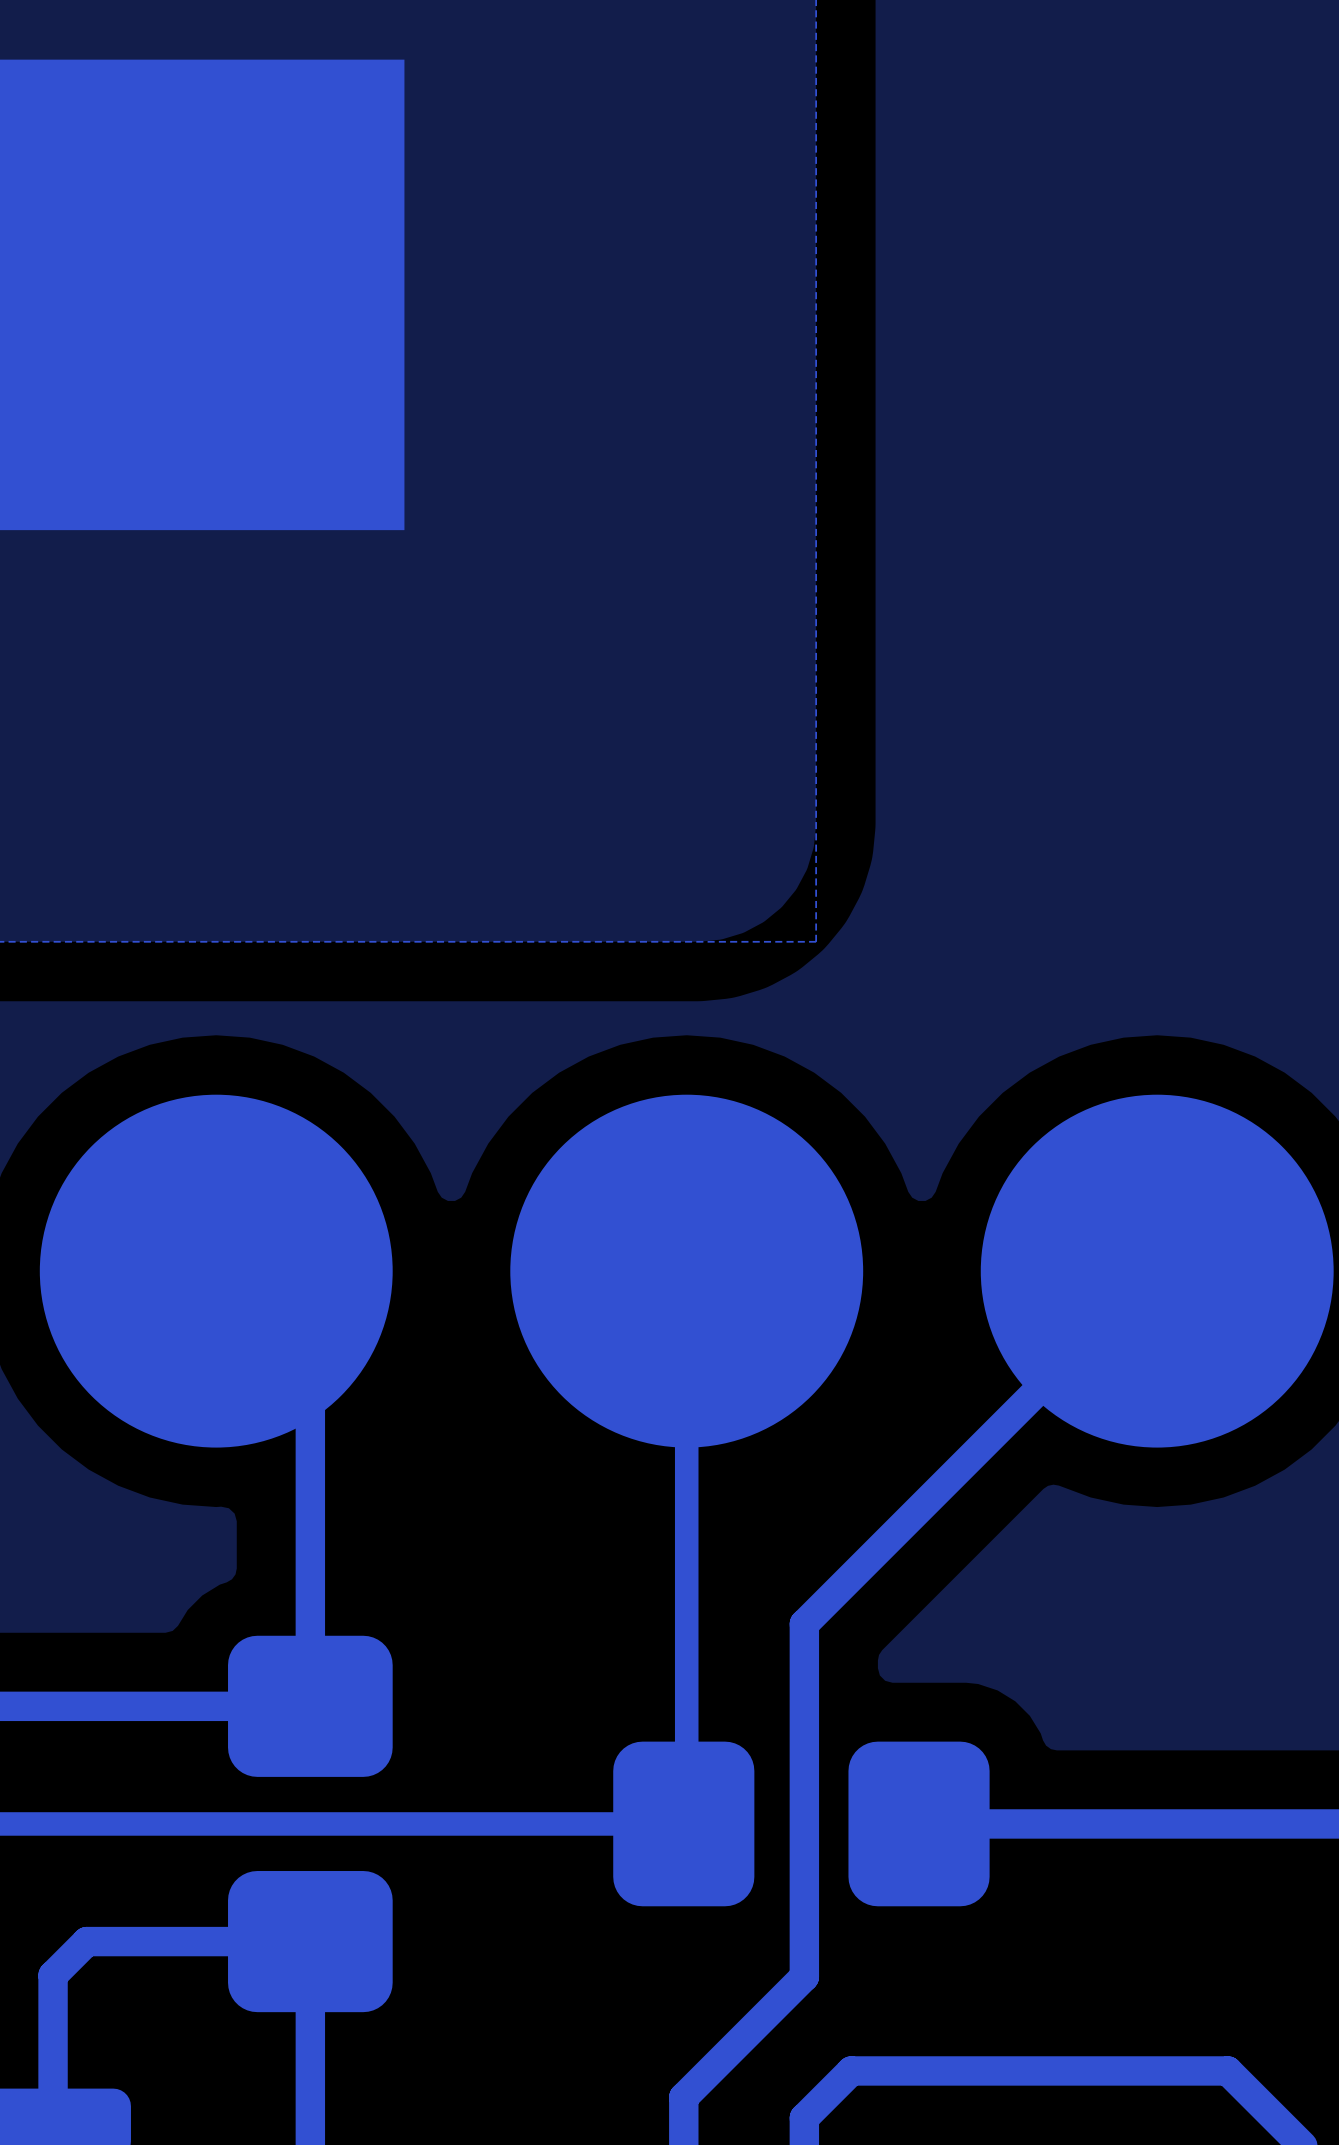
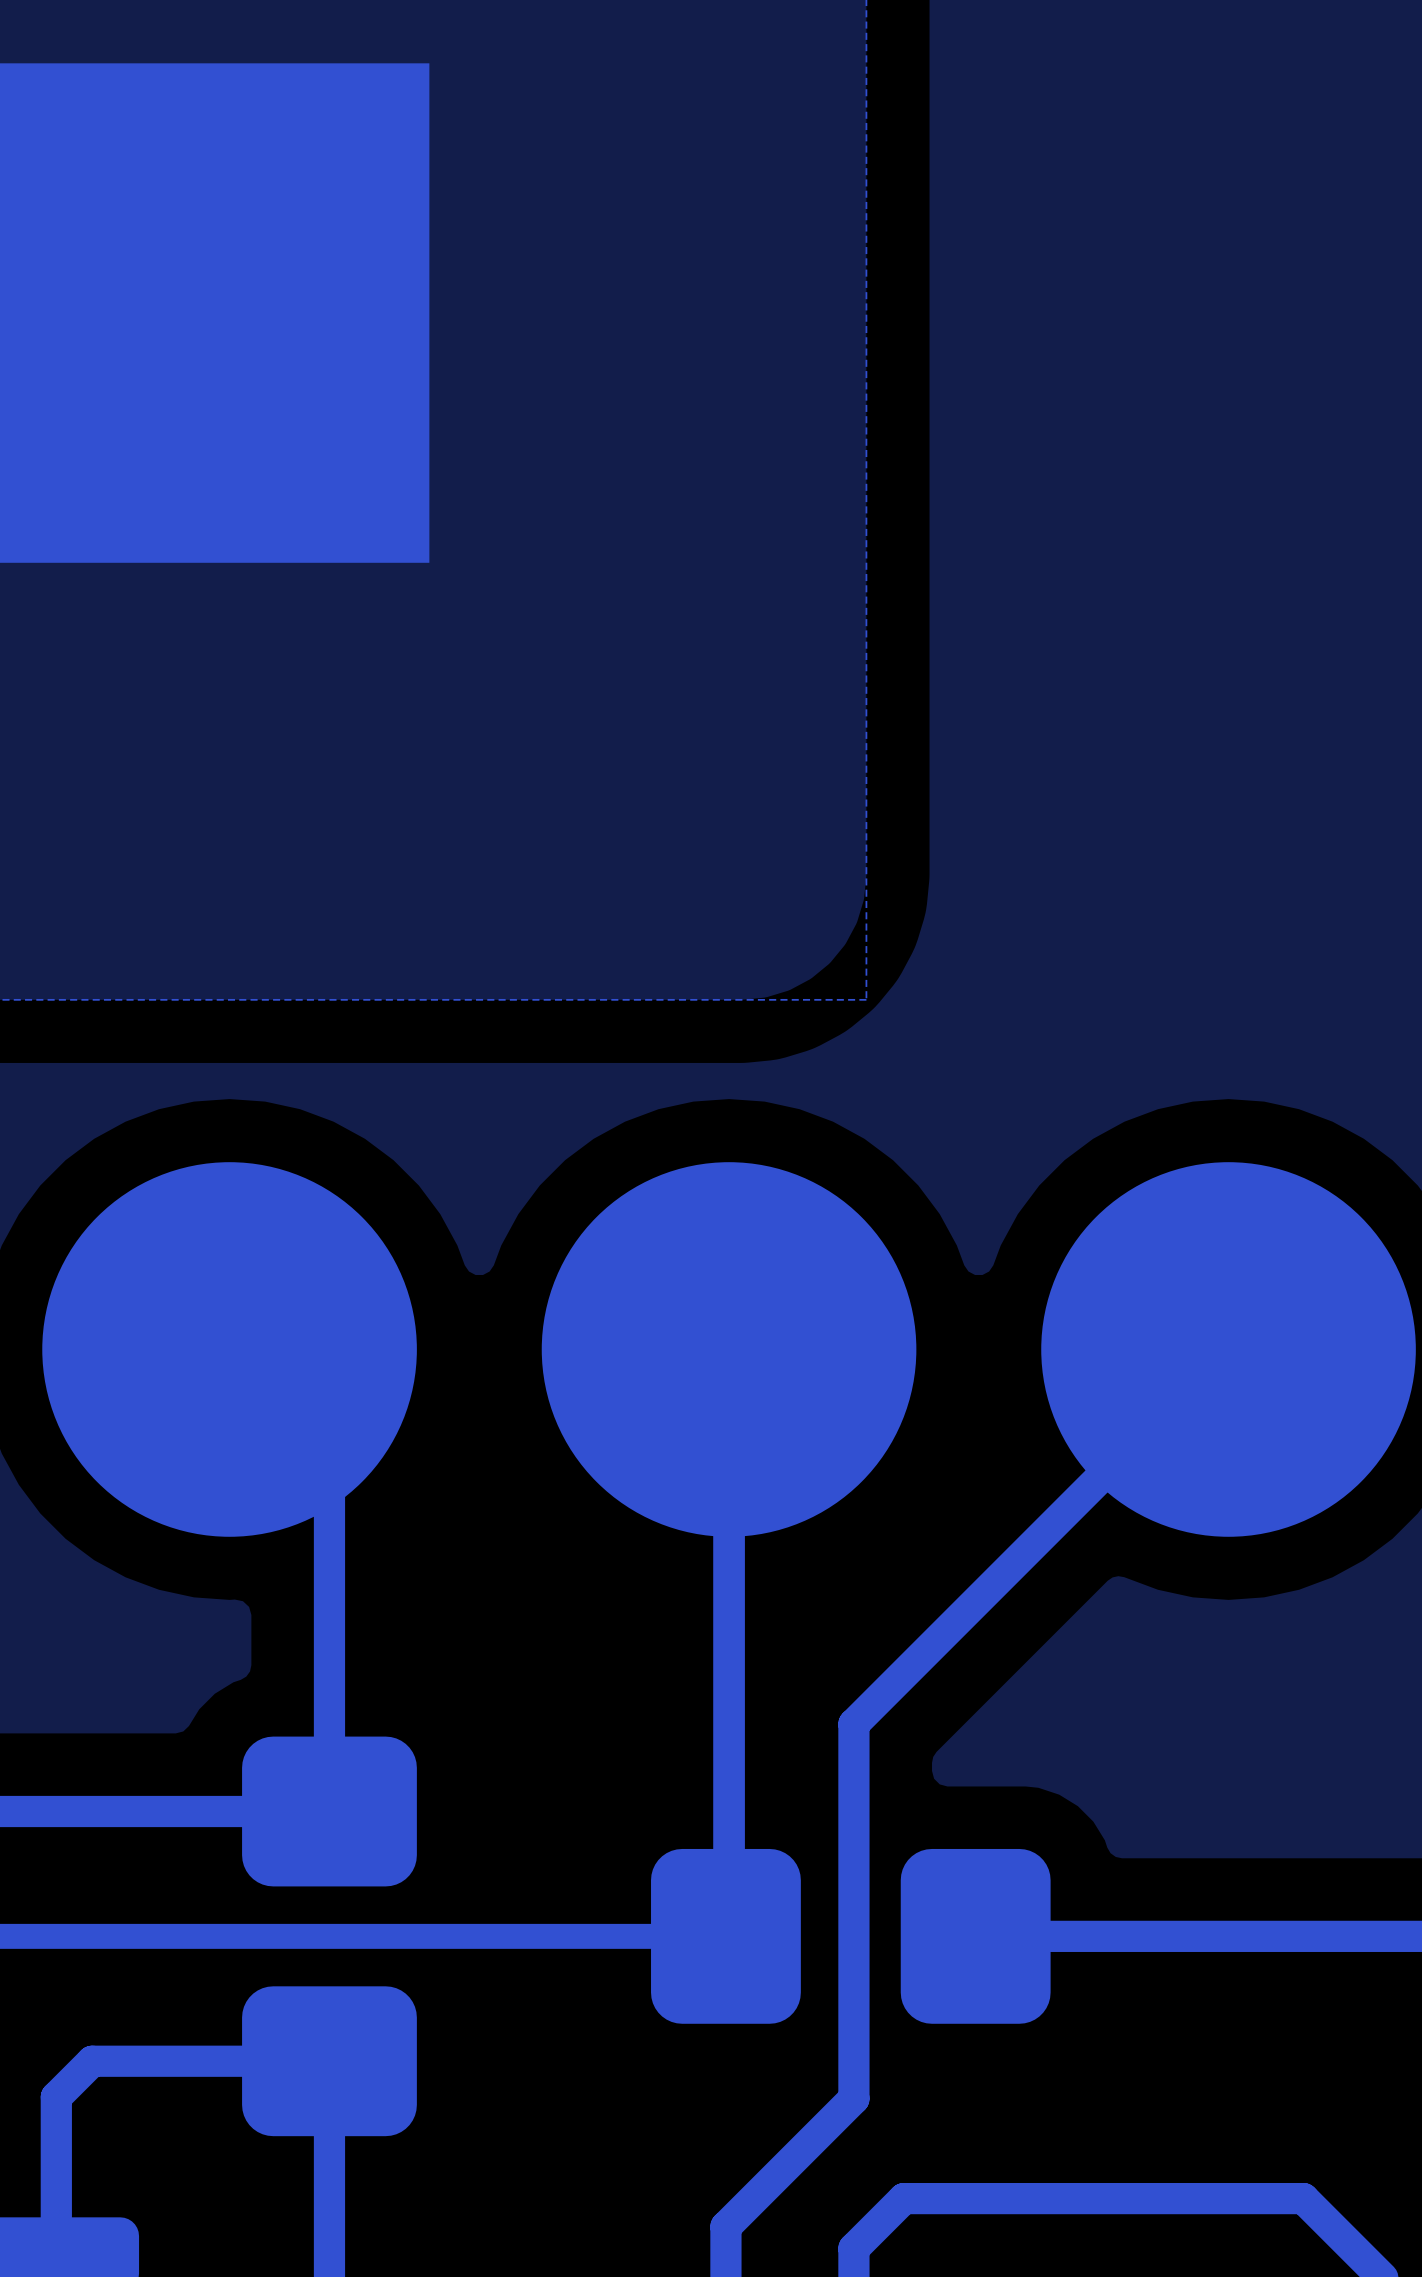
bottom track width: thin (686, 1271) (686, 1821) -> thick (729, 1349) (729, 1933)

